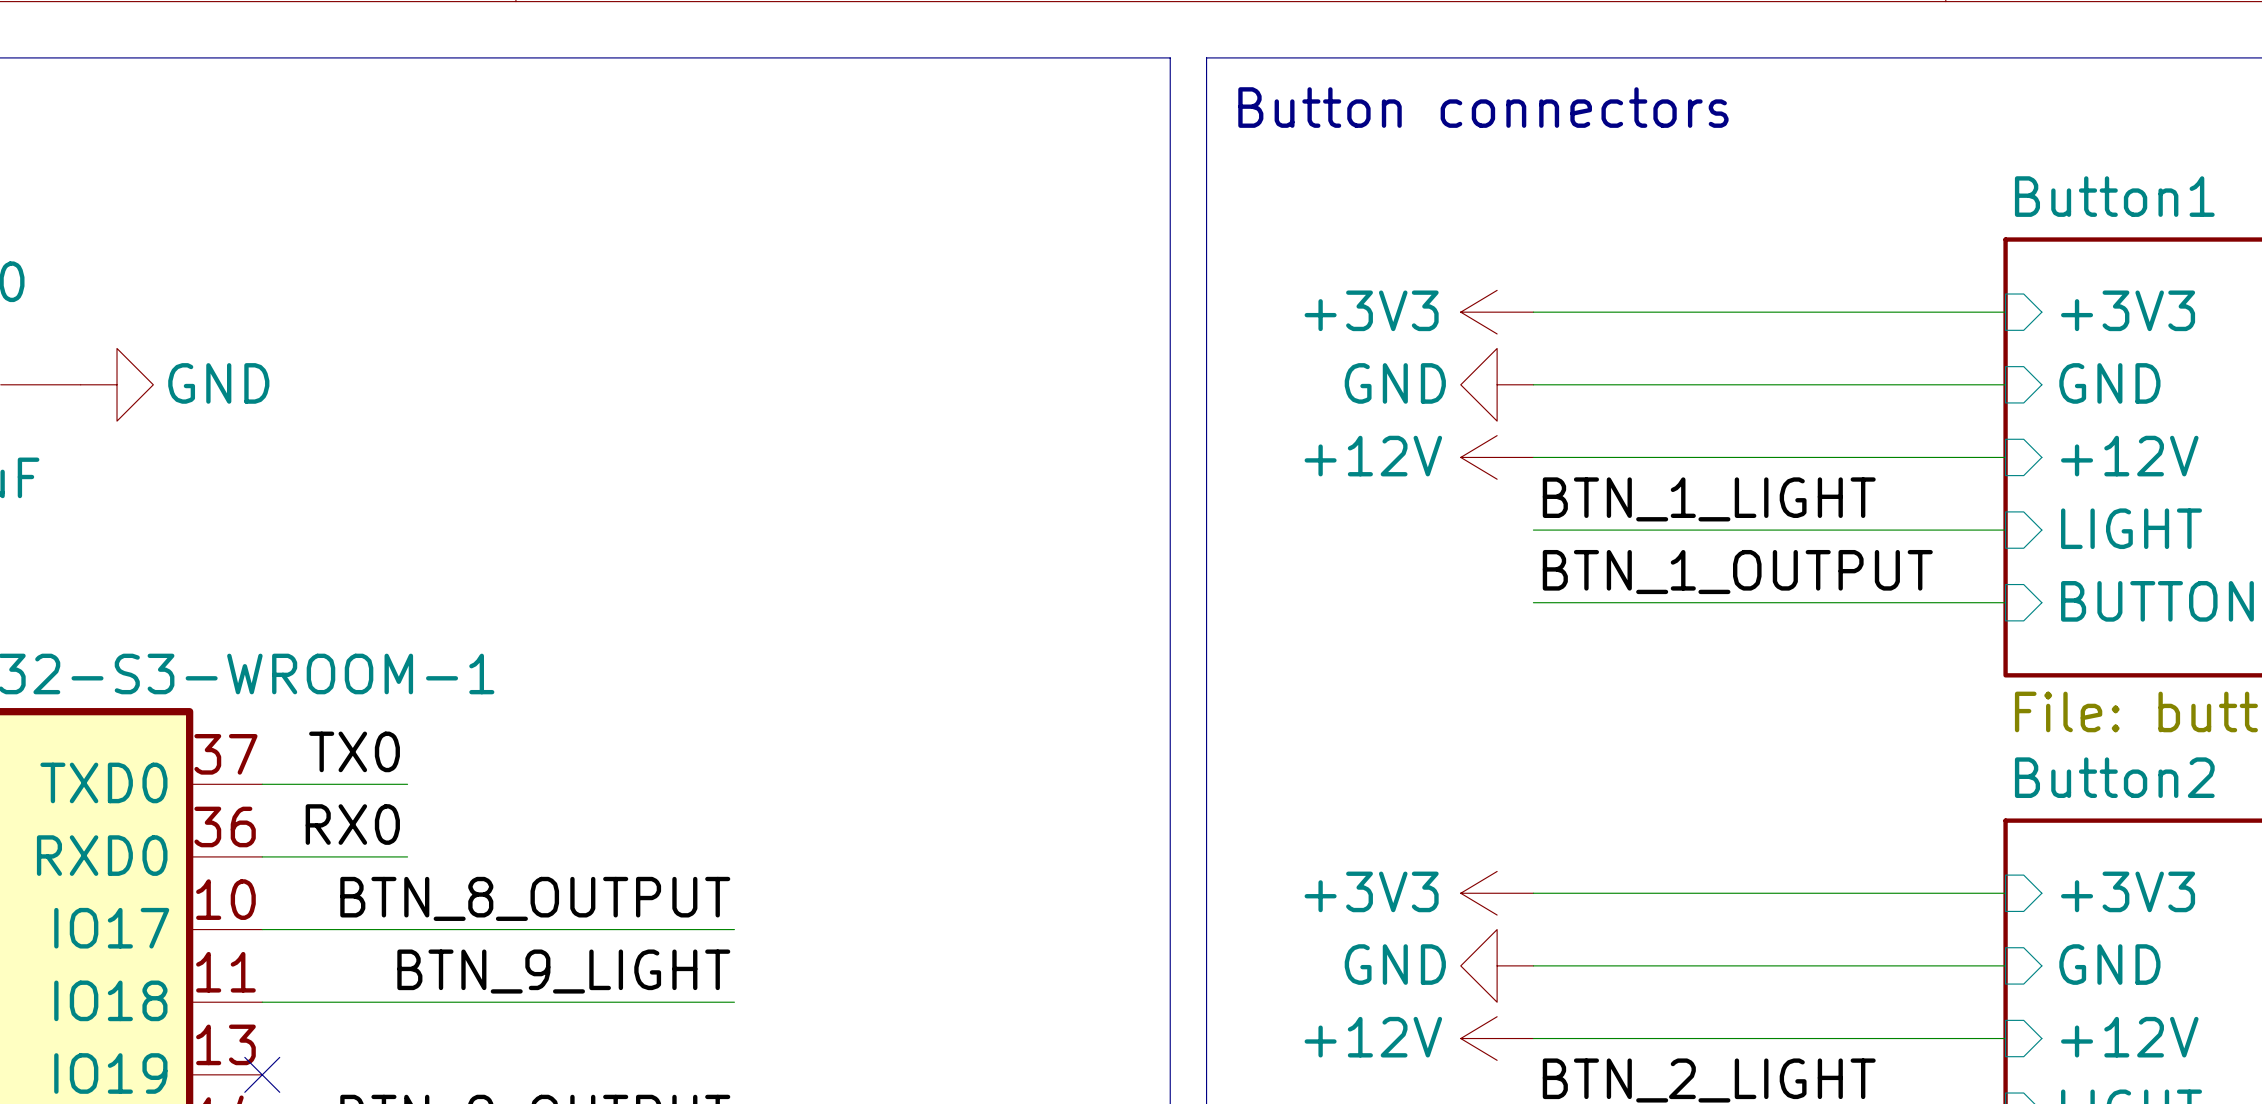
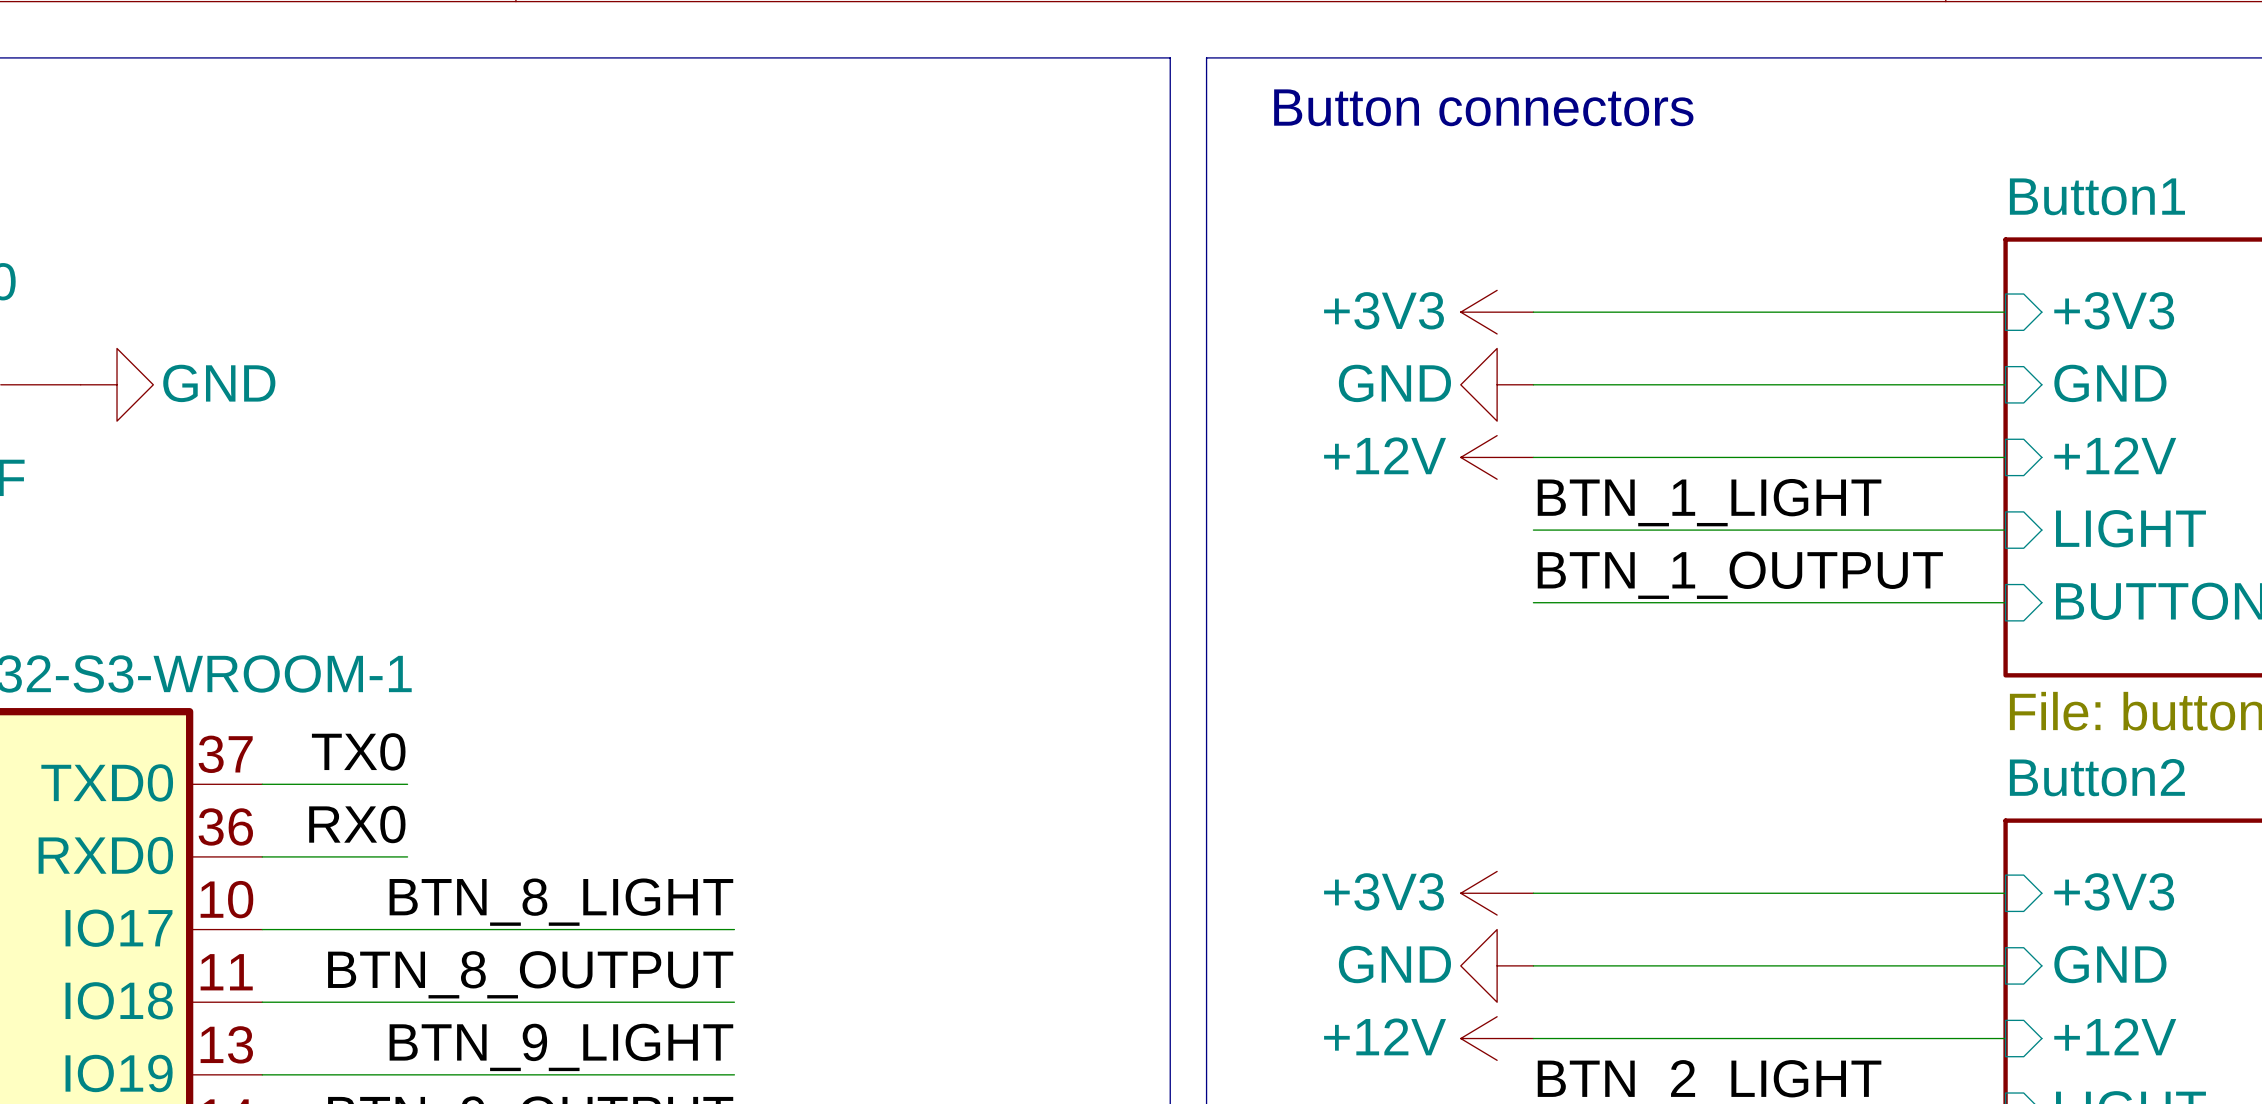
label: BTN_8_OUTPUT (535, 898) -> BTN_8_LIGHT (561, 902)
label: BTN_9_LIGHT (563, 971) -> BTN_8_OUTPUT (530, 974)
label: none -> BTN_9_LIGHT (561, 1047)
wire: none -> (262, 1074) (734, 1074)
no-connect mark: (262, 1074) -> none

